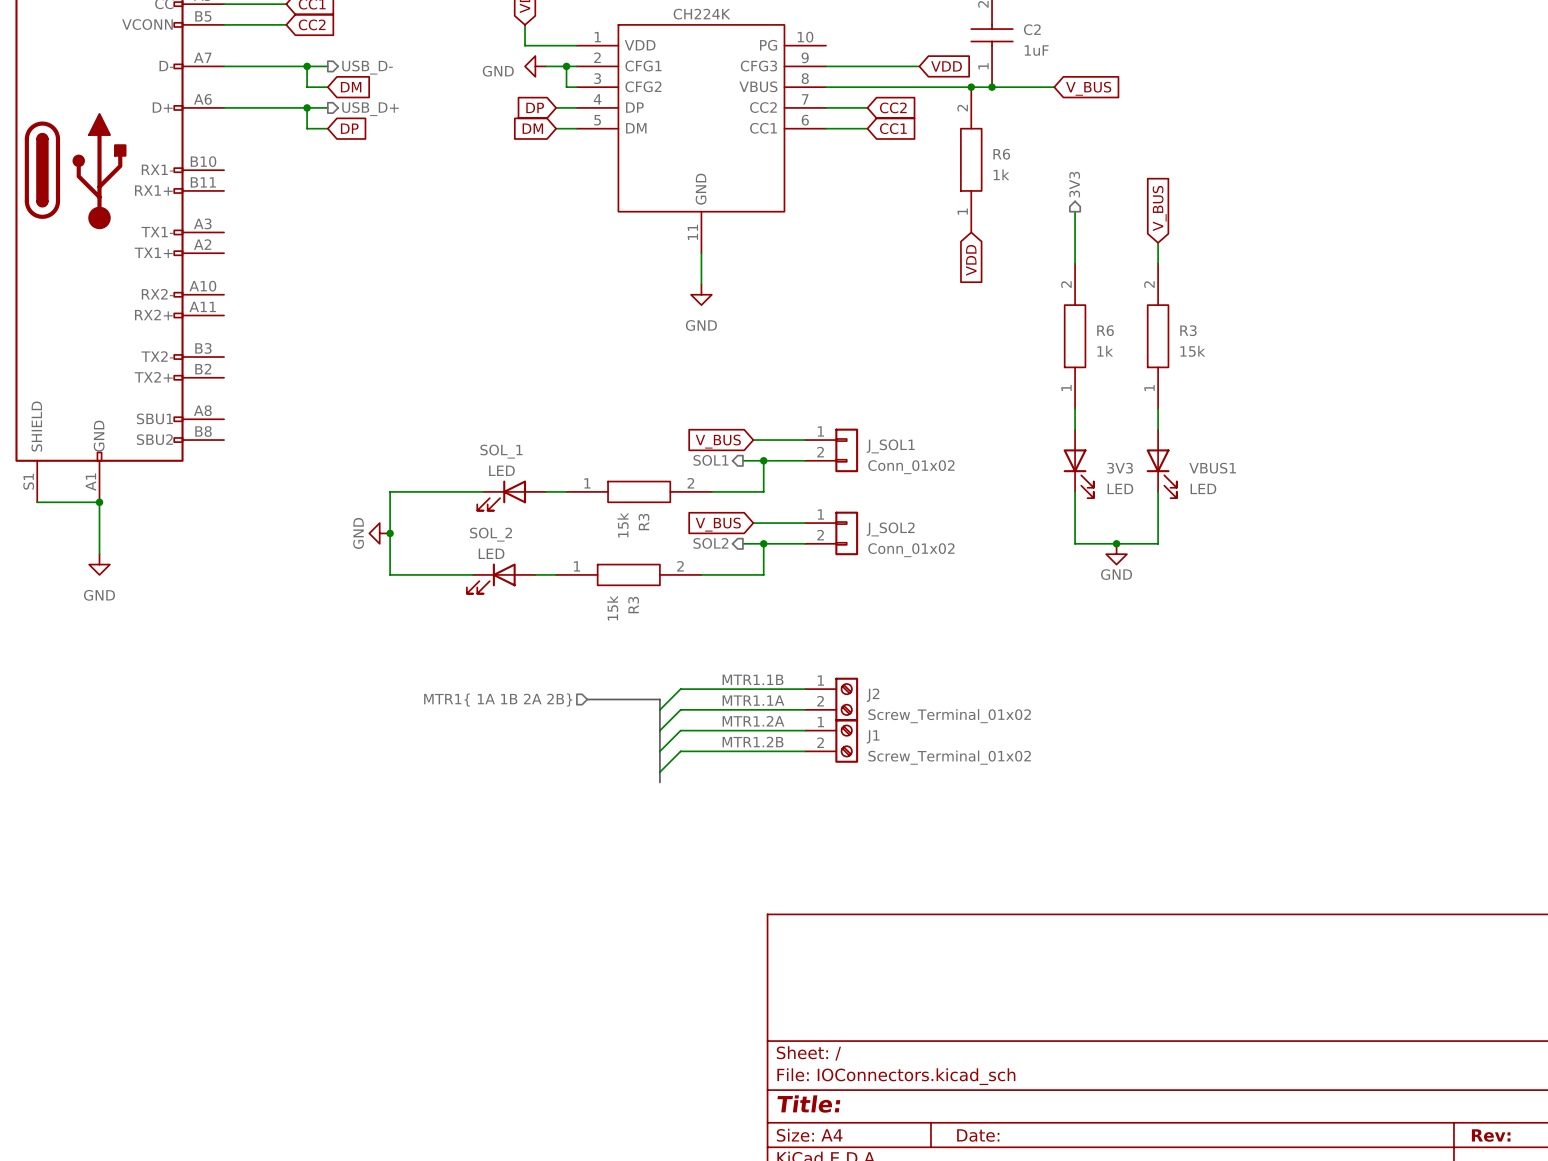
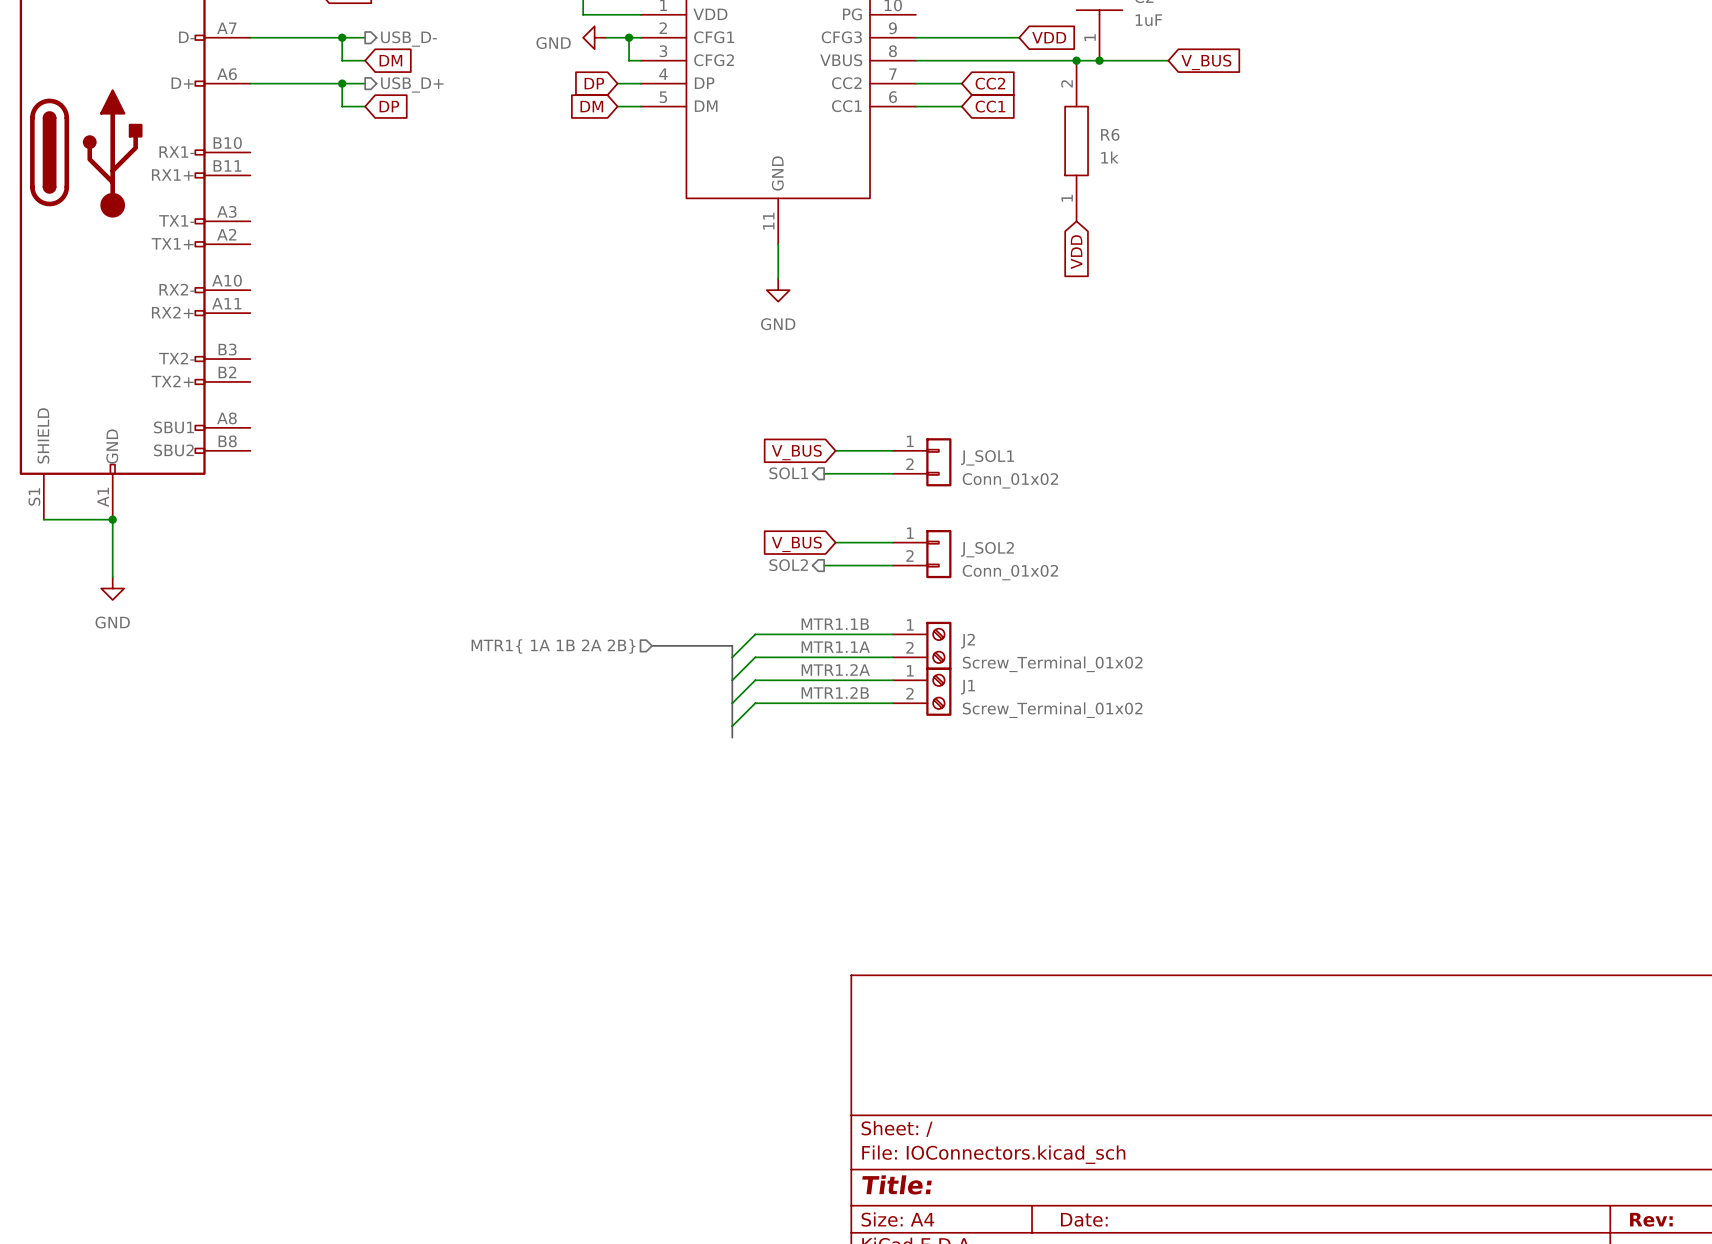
hierarchical label: 3V3 (1074, 184) -> none
global label: V_BUS (1159, 208) -> none
wire: (1075, 211) (1075, 263) -> none
wire: (1158, 242) (1158, 263) -> none
R6: 1k (1075, 336) -> none
R3: 15k (1158, 336) -> none
wire: (1075, 408) (1075, 429) -> none
wire: (1158, 408) (1158, 429) -> none
wire: (763, 460) (763, 491) (711, 491) -> none
junction: (763, 460) -> none
3V3: LED (1078, 463) -> none
VBUS1: LED (1161, 463) -> none
wire: (483, 491) (390, 491) (390, 574) (473, 574) -> none
wire: (545, 491) (566, 491) -> none
R3: 15k (639, 491) -> none
wire: (1075, 491) (1075, 543) (1158, 543) (1158, 491) -> none
SOL_1: LED (511, 495) -> none
power symbol: GND (379, 533) -> none
junction: (390, 533) -> none
wire: (763, 543) (763, 574) (701, 574) -> none
junction: (763, 543) -> none
junction: (1116, 543) -> none
power symbol: GND (1116, 554) -> none
wire: (535, 574) (556, 574) -> none
R3: 15k (628, 574) -> none
SOL_2: LED (501, 578) -> none
label position: MTR1.1B (753, 679) -> MTR1.1B (835, 624)
wire: (805, 689) (680, 689) (659, 709) -> (892, 634) (755, 634) (732, 657)
bus: (587, 699) (659, 699) (659, 782) -> (652, 645) (732, 645) (732, 737)
J2 position: (831, 699) -> (922, 645)
hierarchical label position: MTR1{ 1A 1B 2A 2B} (498, 700) -> MTR1{ 1A 1B 2A 2B} (553, 646)
label position: MTR1.1A (753, 700) -> MTR1.1A (835, 647)
wire: (805, 709) (680, 709) (659, 730) -> (892, 657) (755, 657) (732, 680)
label position: MTR1.2A (753, 721) -> MTR1.2A (835, 669)
wire: (805, 730) (680, 730) (659, 751) -> (892, 680) (755, 680) (732, 703)
J1 position: (831, 741) -> (922, 691)
label position: MTR1.2B (753, 742) -> MTR1.2B (835, 692)
wire: (805, 751) (680, 751) (659, 772) -> (892, 703) (755, 703) (732, 726)

